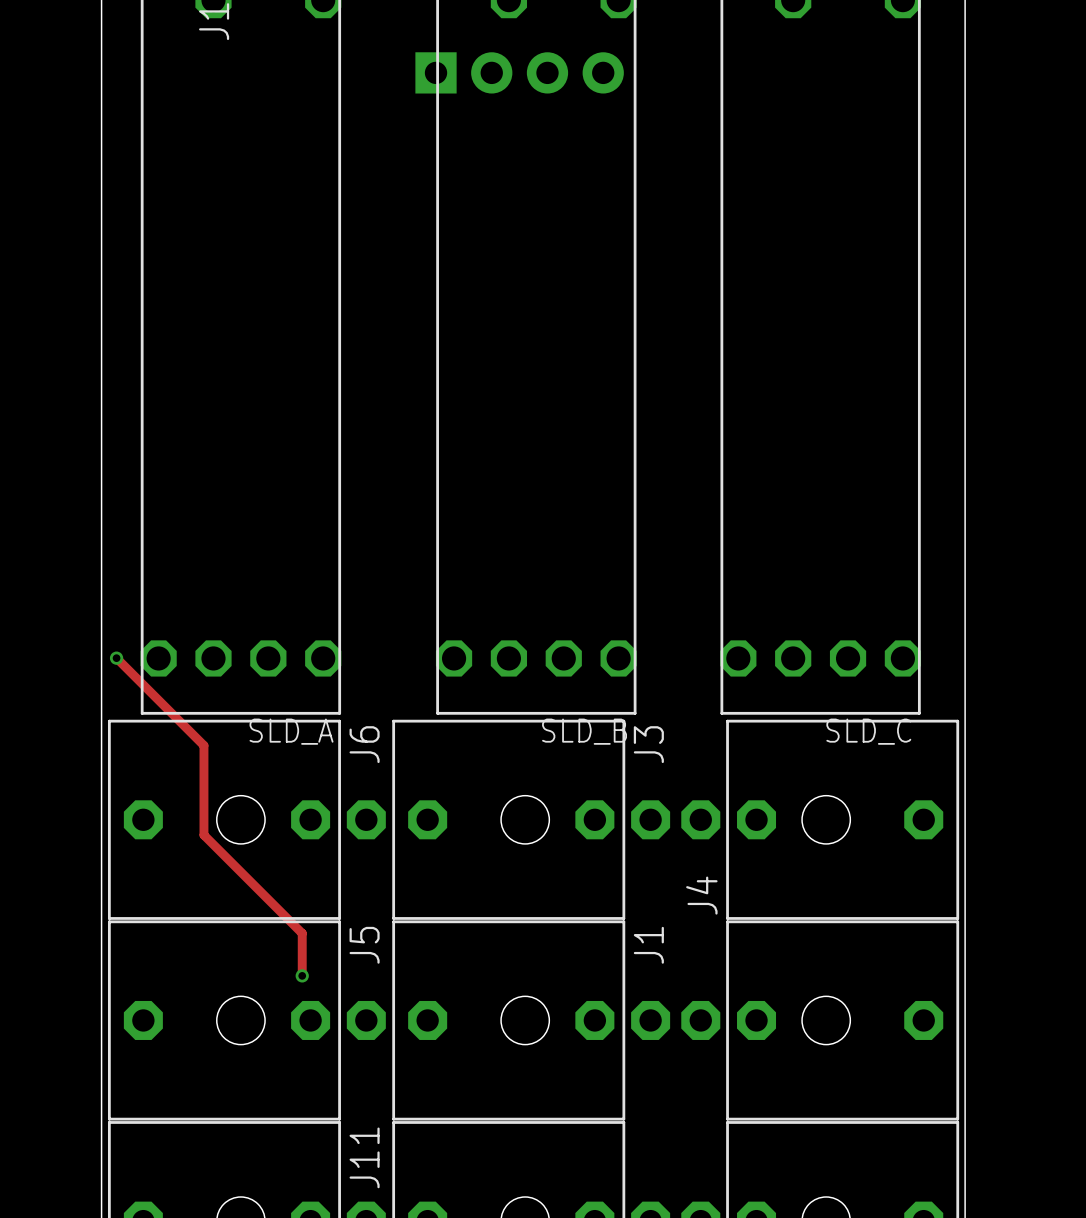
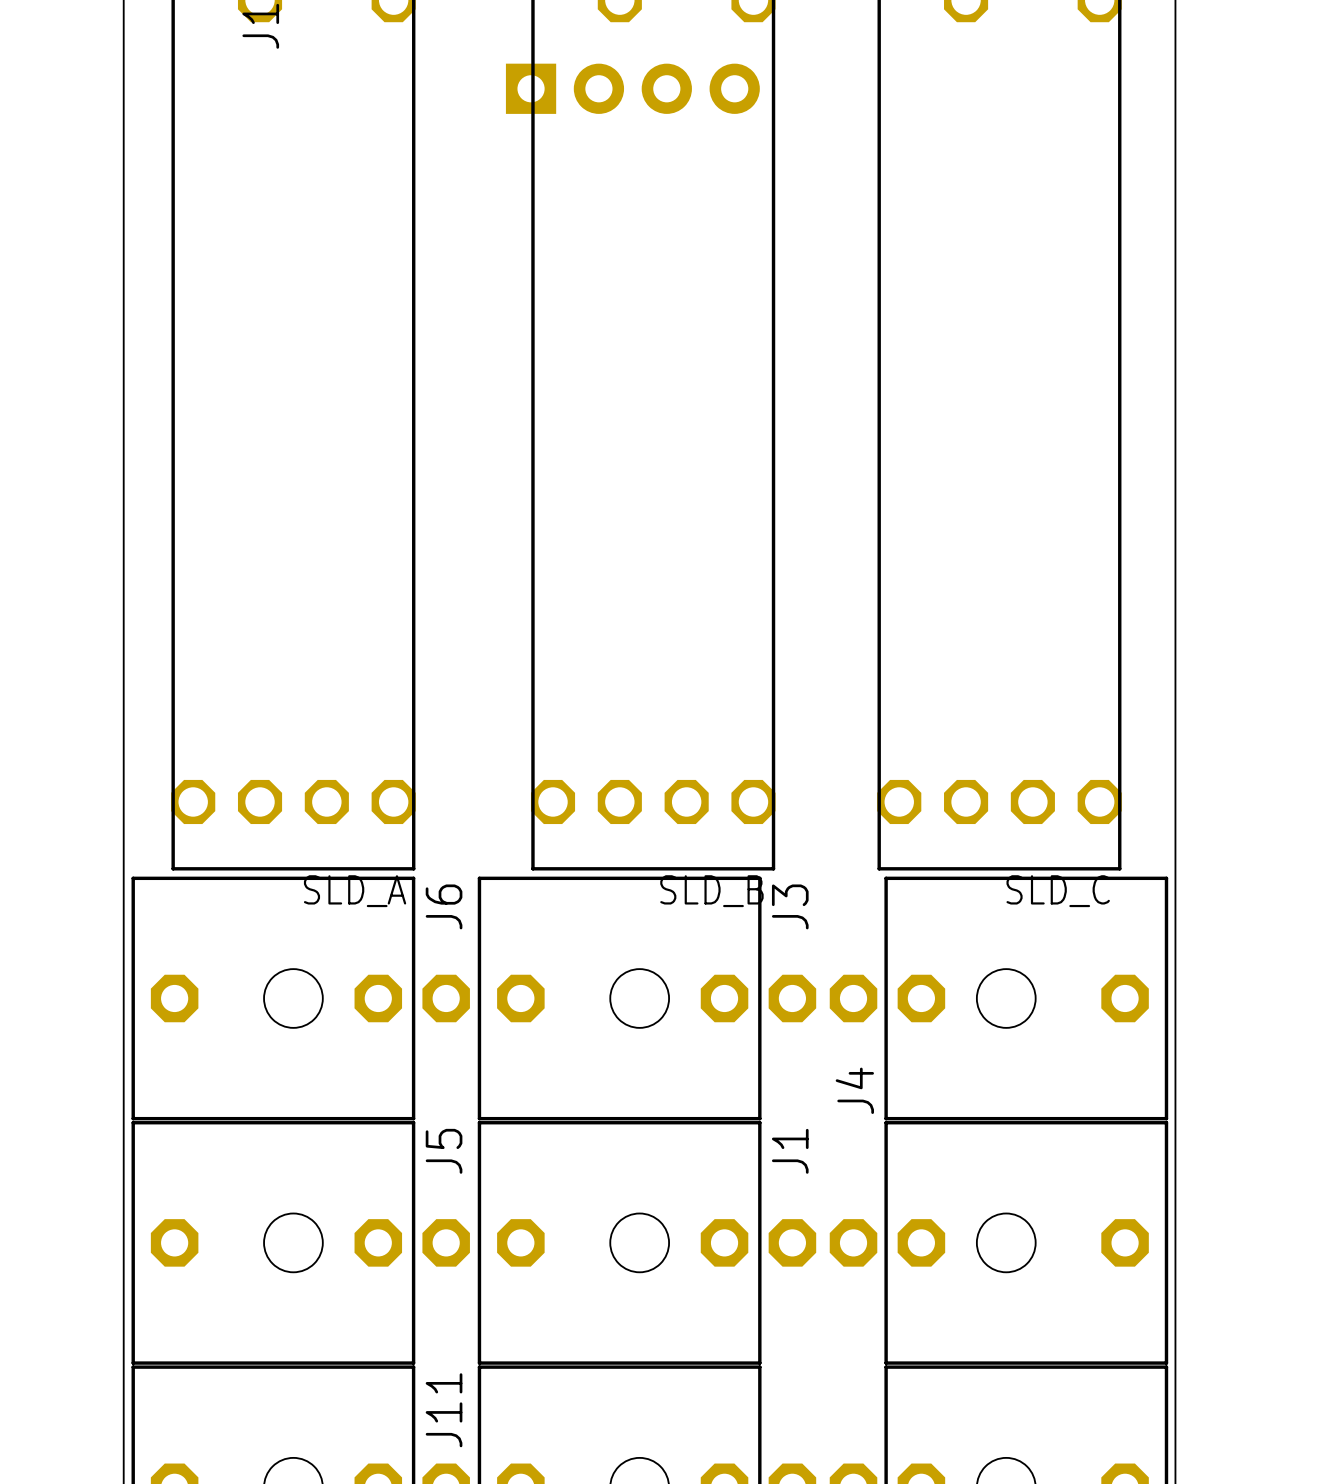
track: (116, 658) (203, 745) (203, 835) (302, 933) (302, 975) -> none
via: (116, 658) -> none
via: (302, 975) -> none

